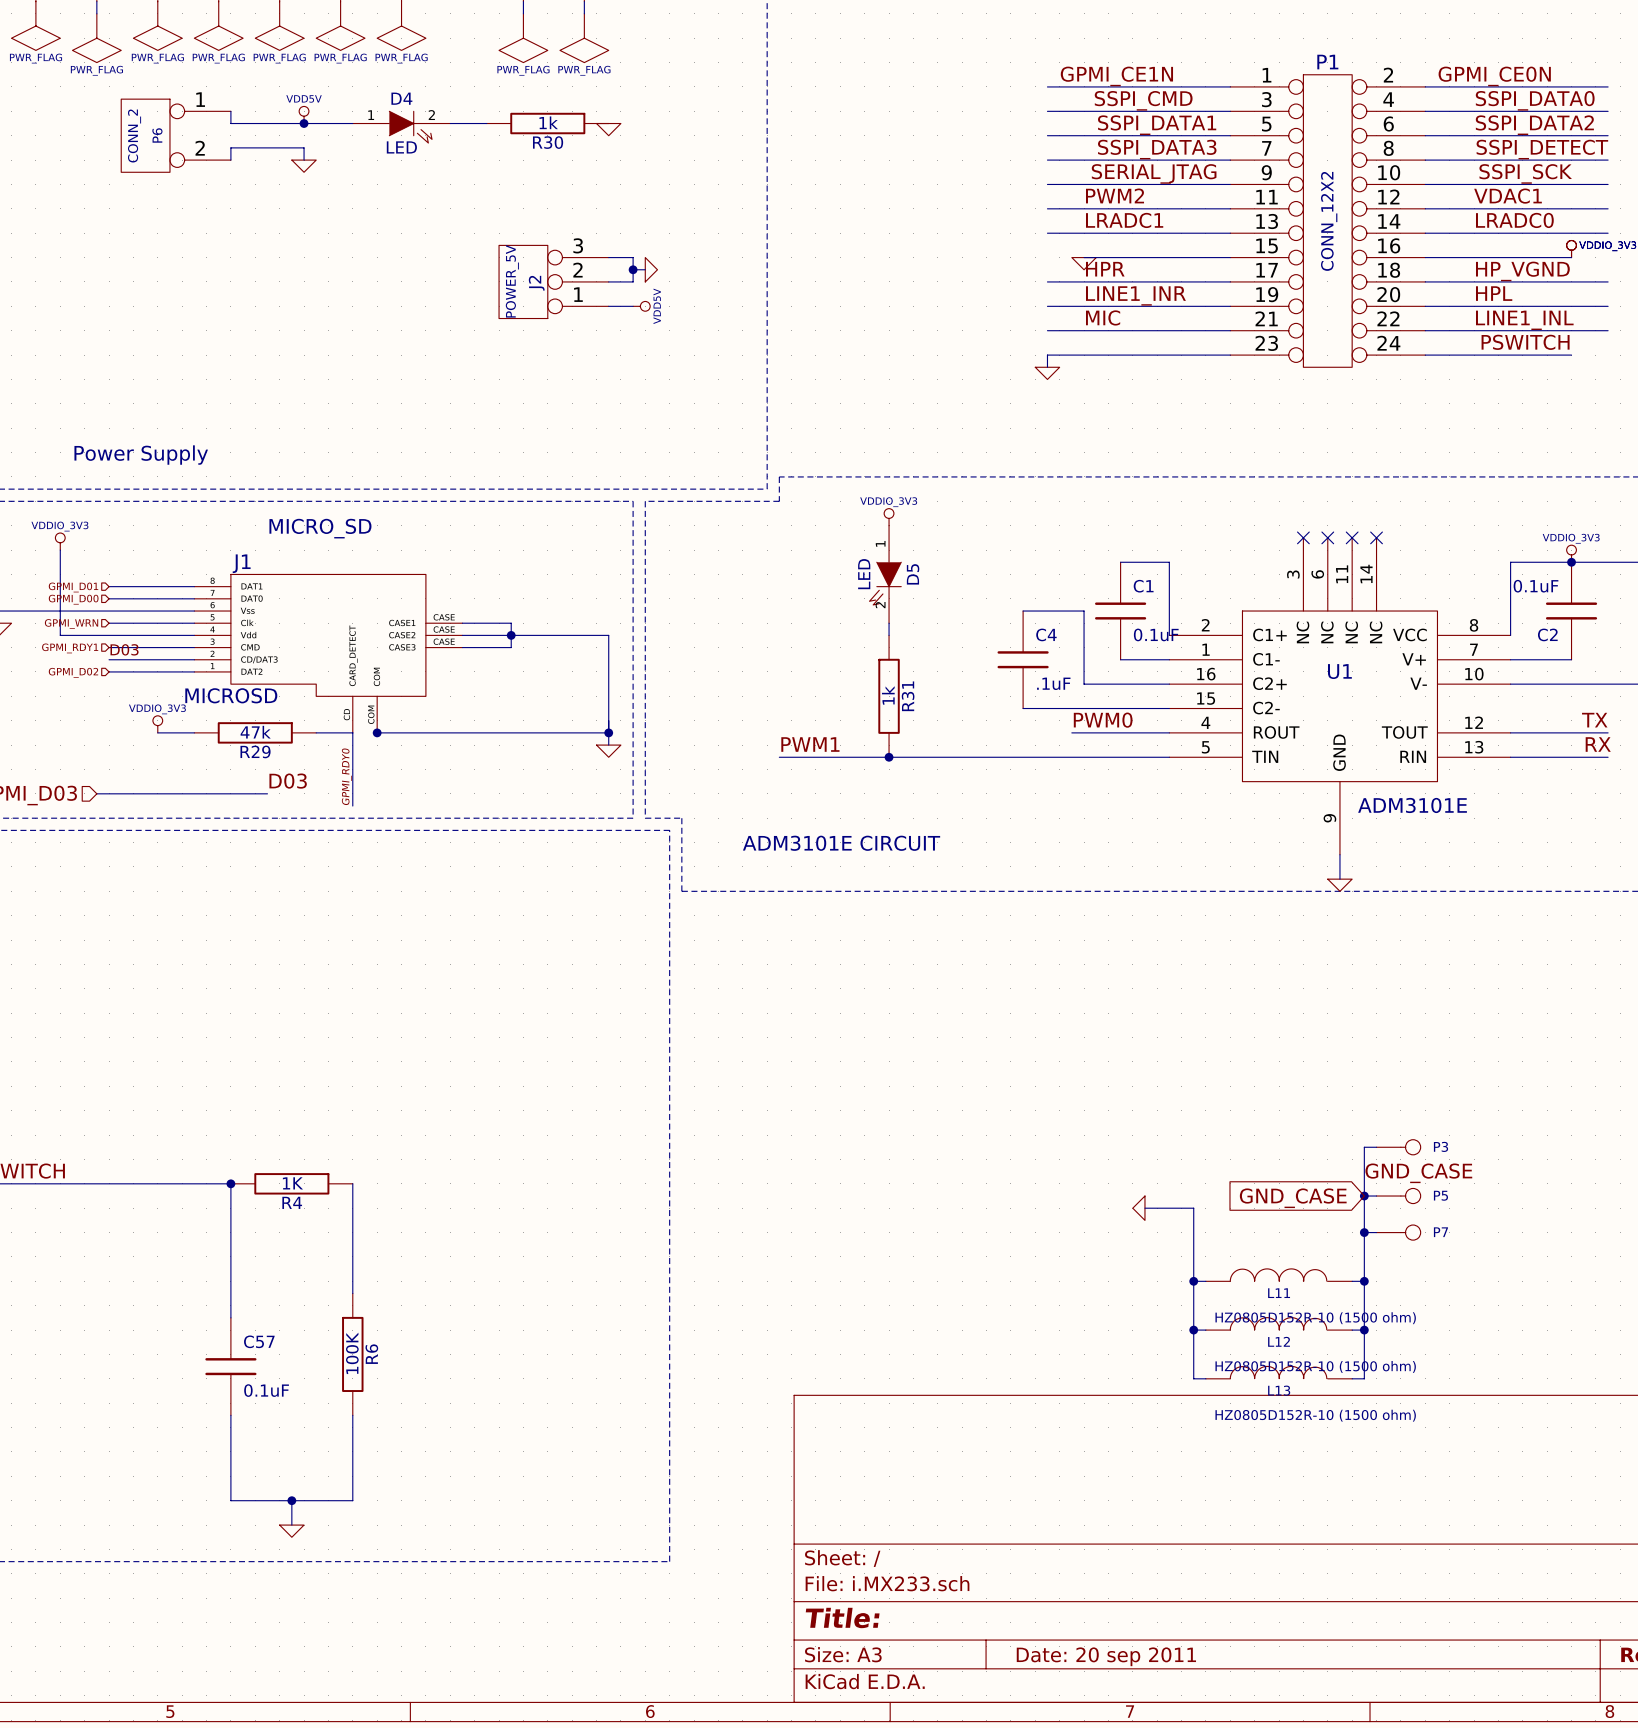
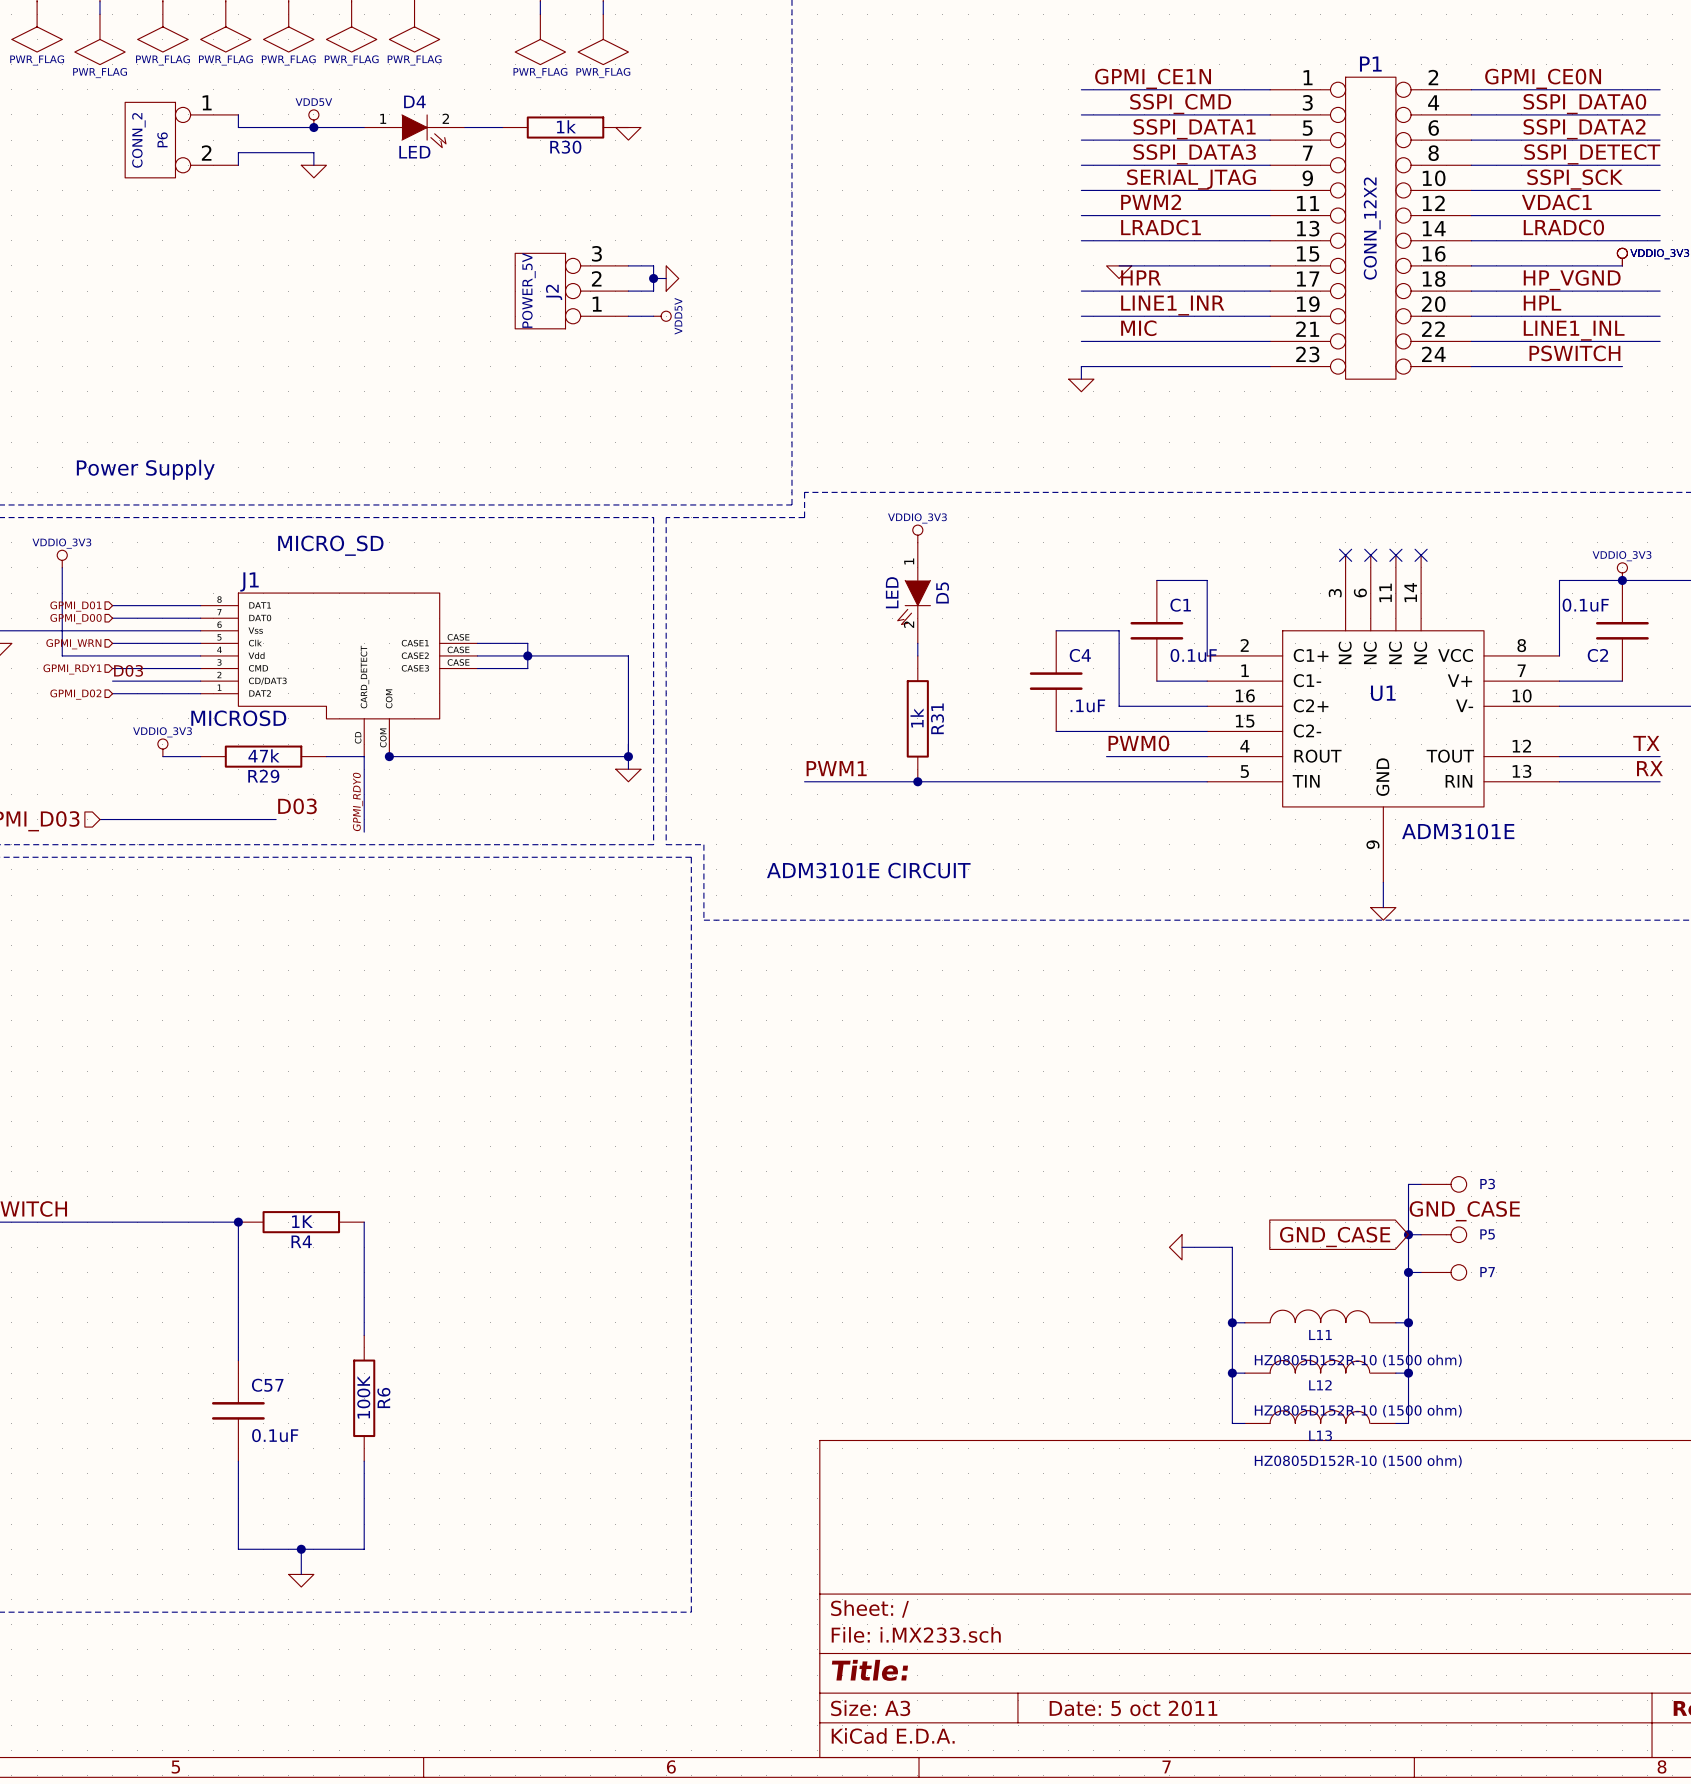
title block: Date: 20 sep 2011 (1106, 1656) -> Date: 5 oct 2011 (1133, 1708)

